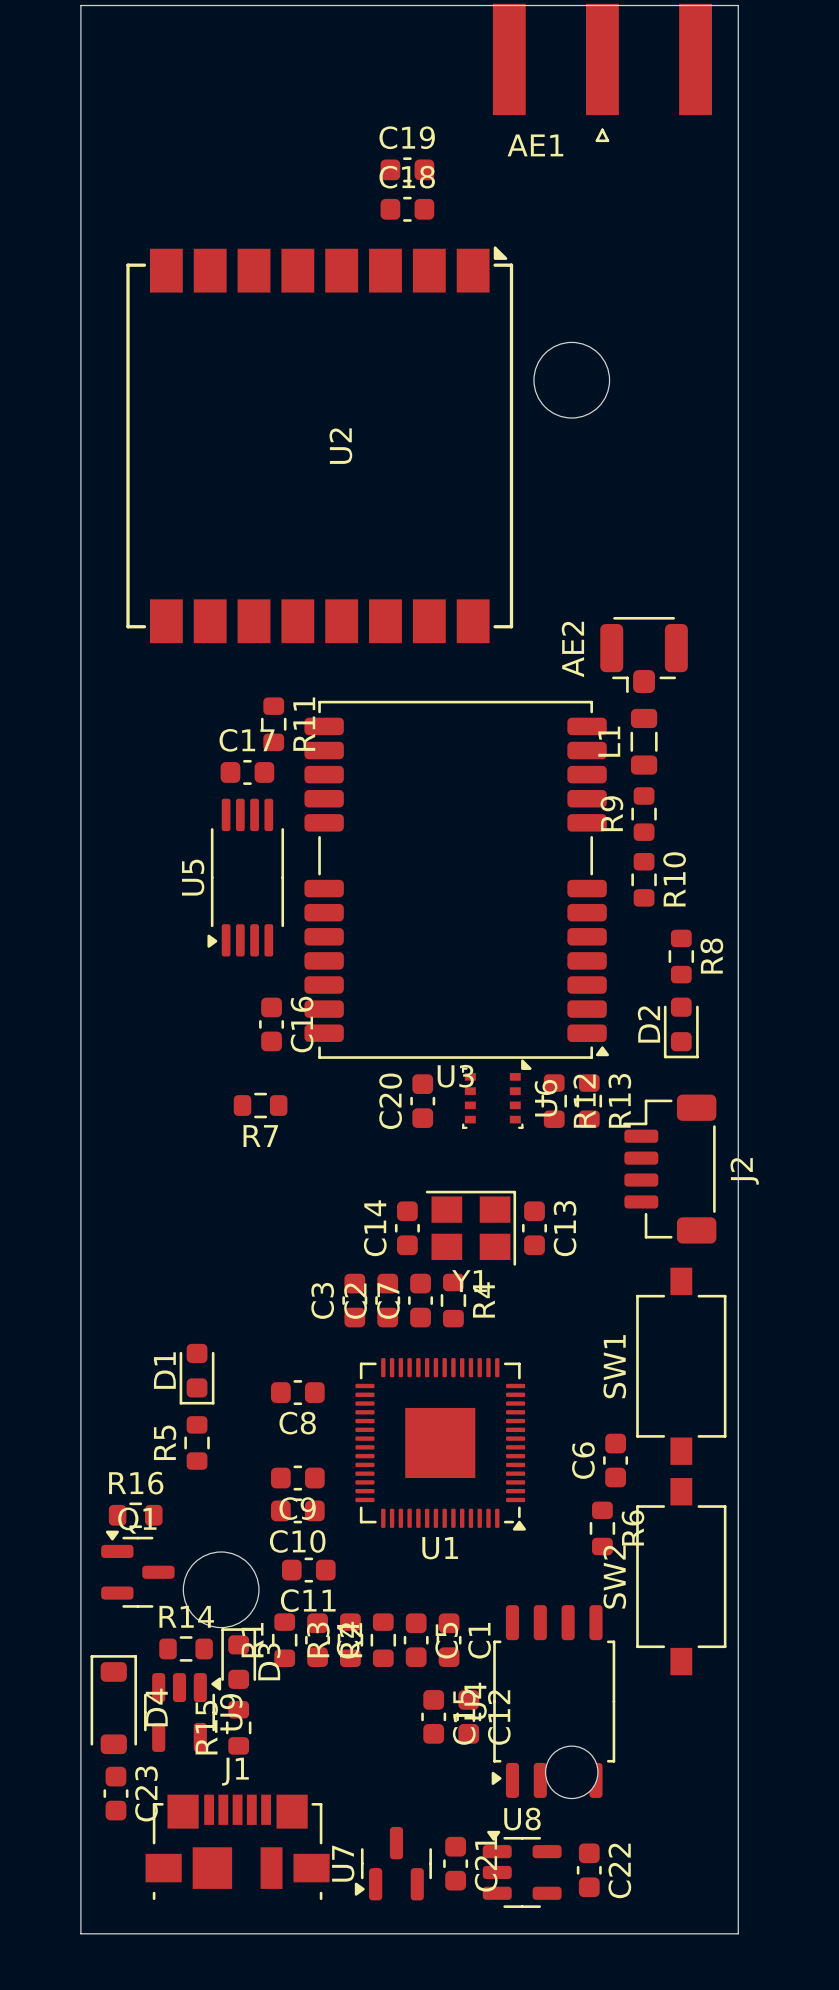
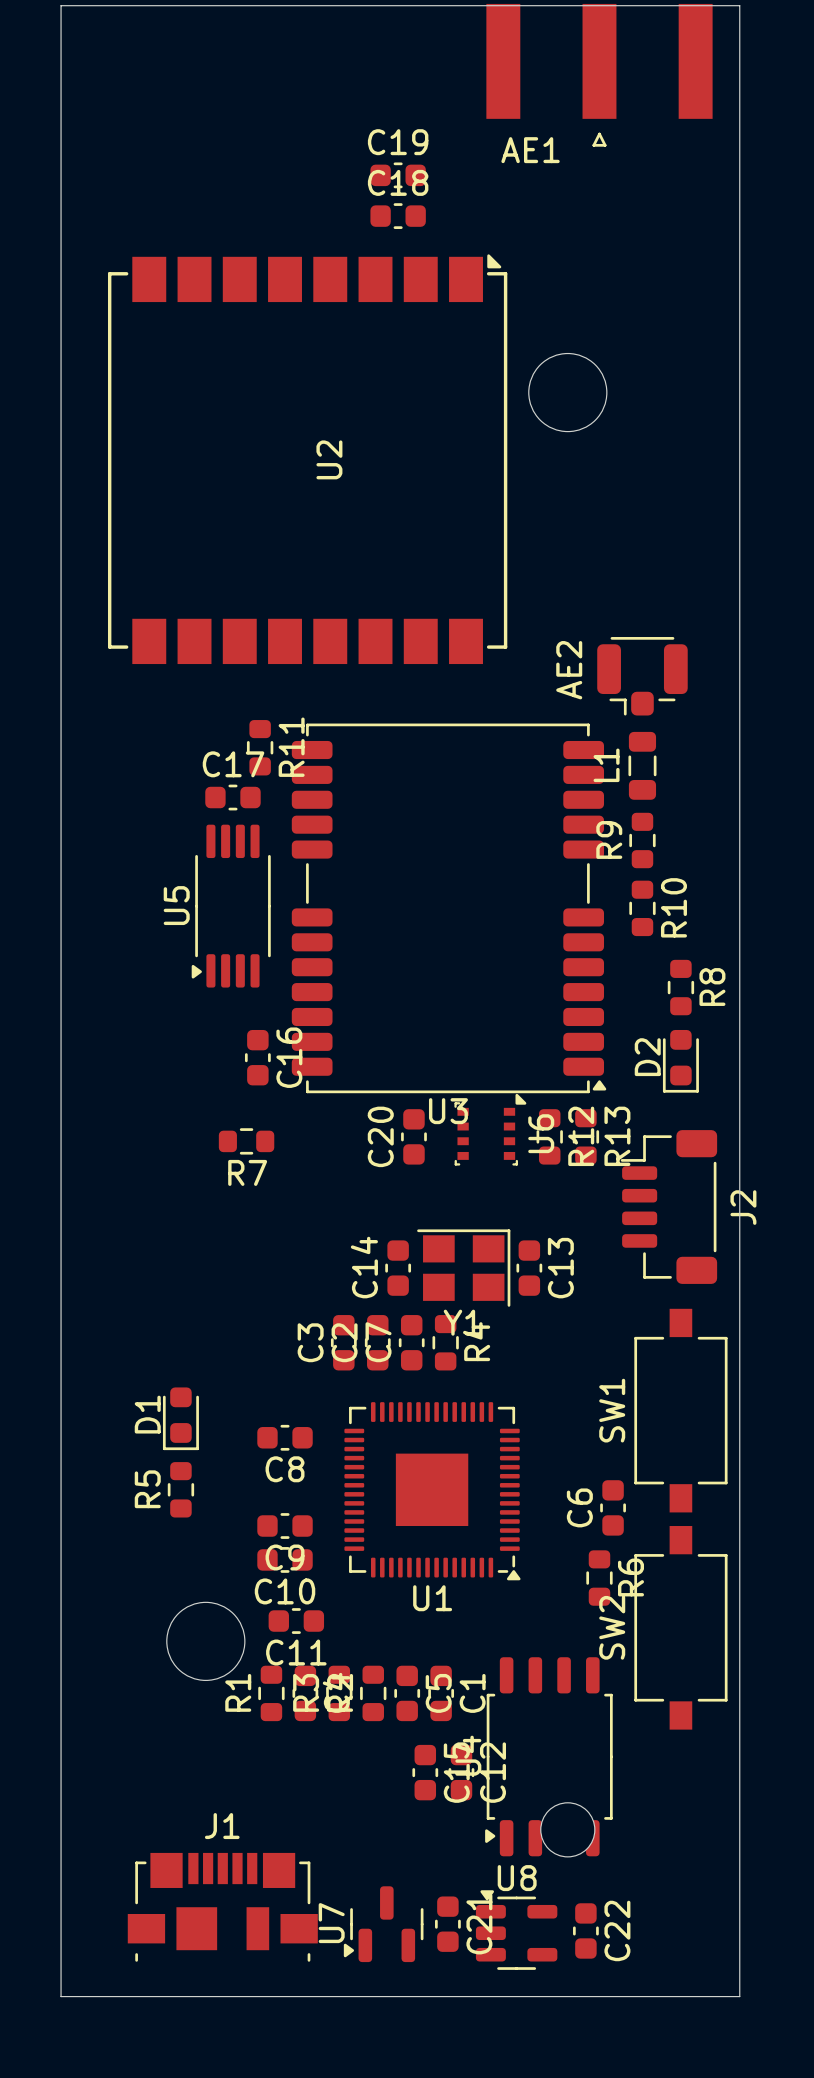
R16: (135, 1515) -> none
Q1: (137, 1569) -> none
R14: (186, 1648) -> none
D3: (238, 1658) -> none
D4: (113, 1704) -> none
U9: (182, 1712) -> none
R15: (238, 1727) -> none
C23: (115, 1793) -> none

